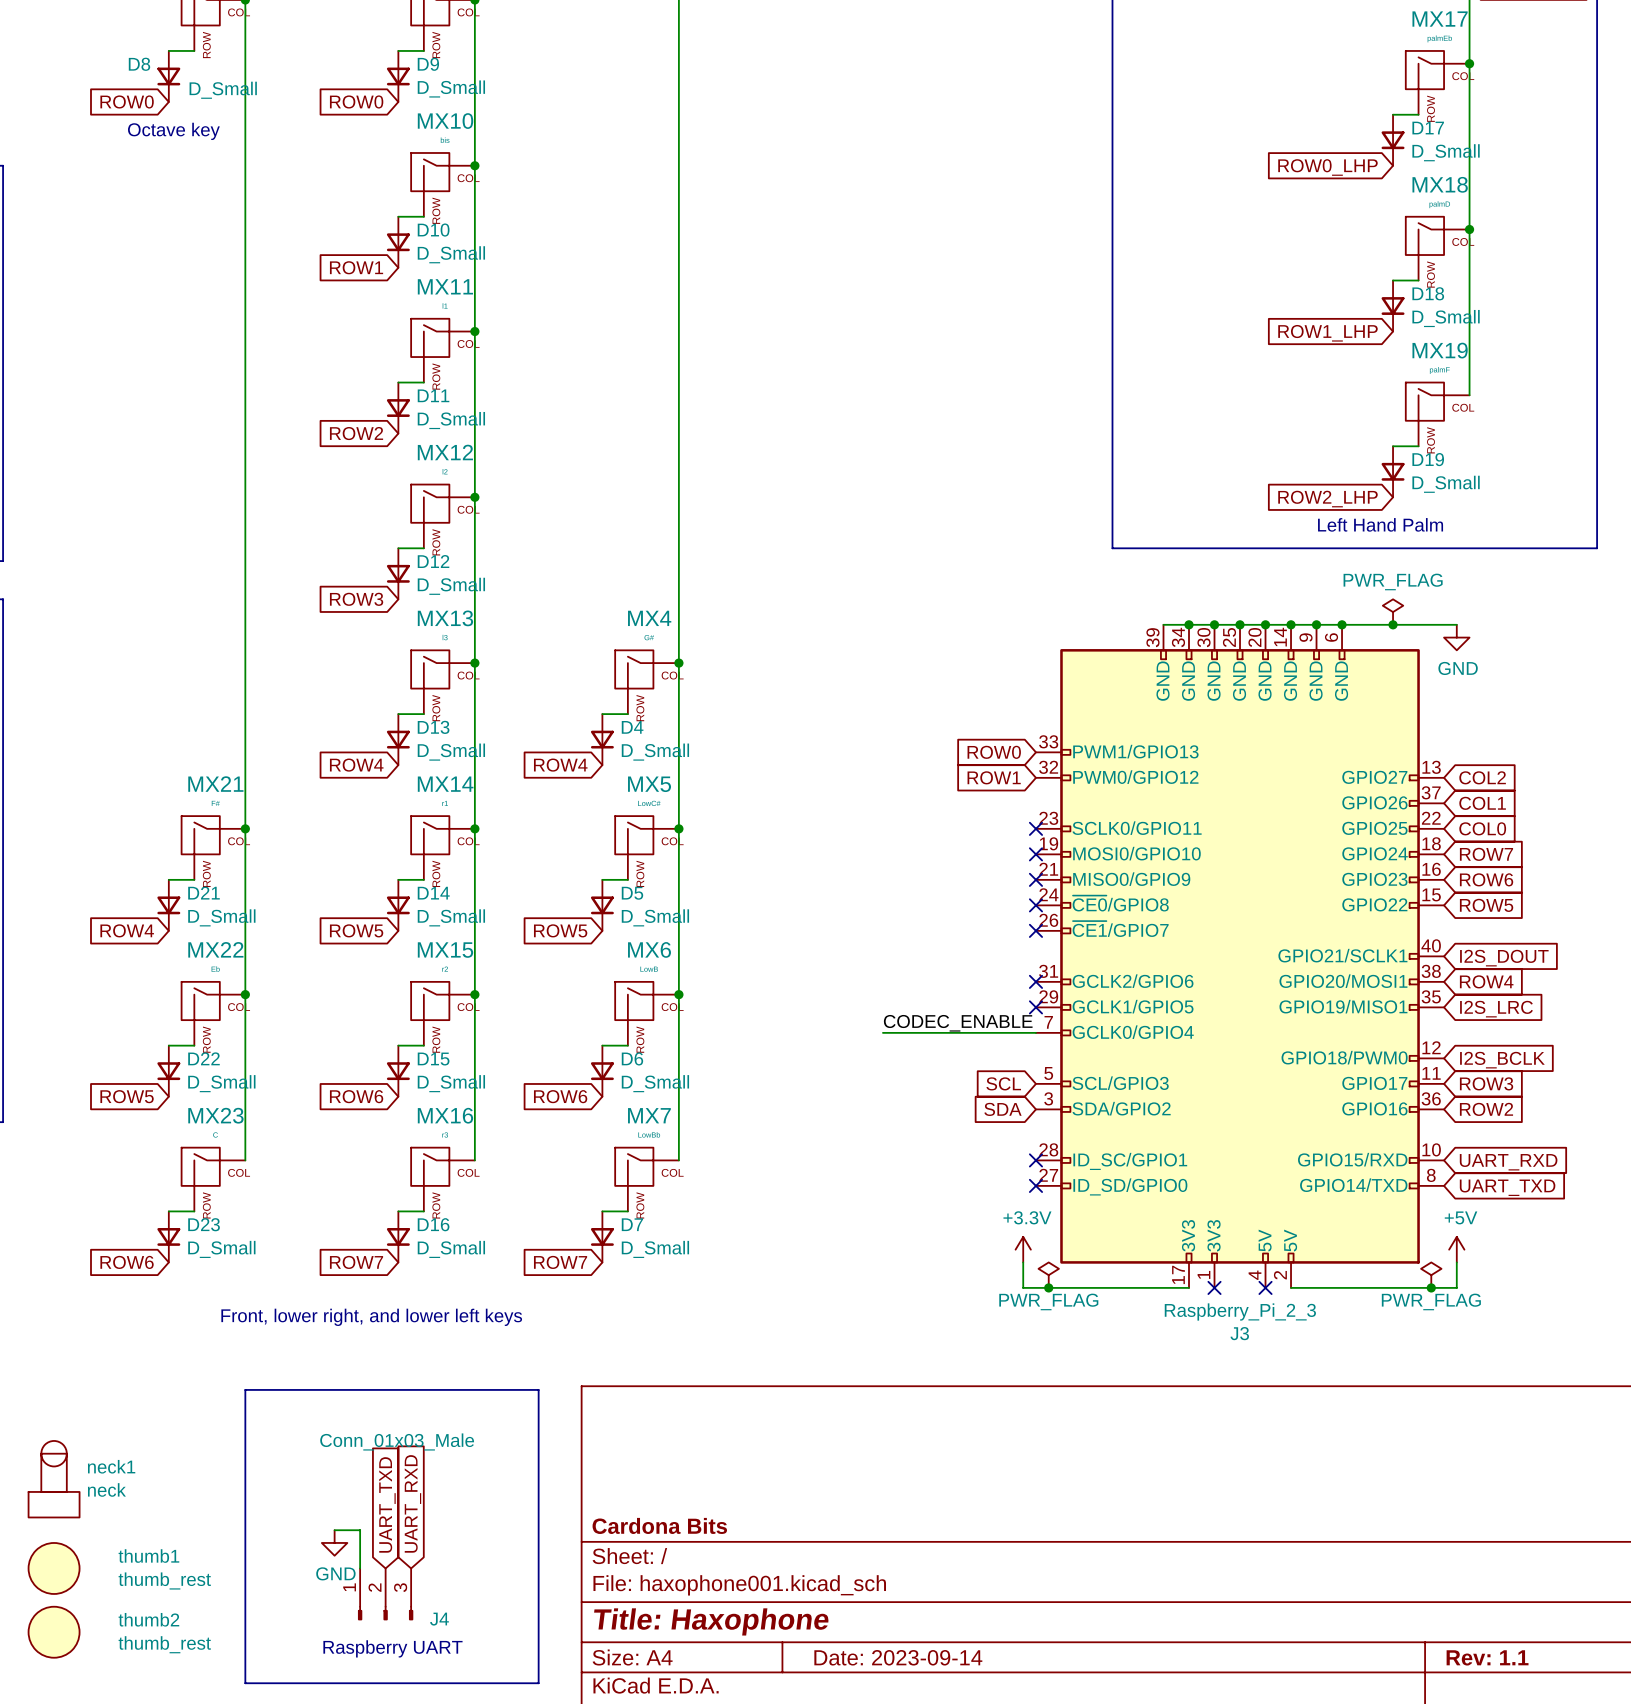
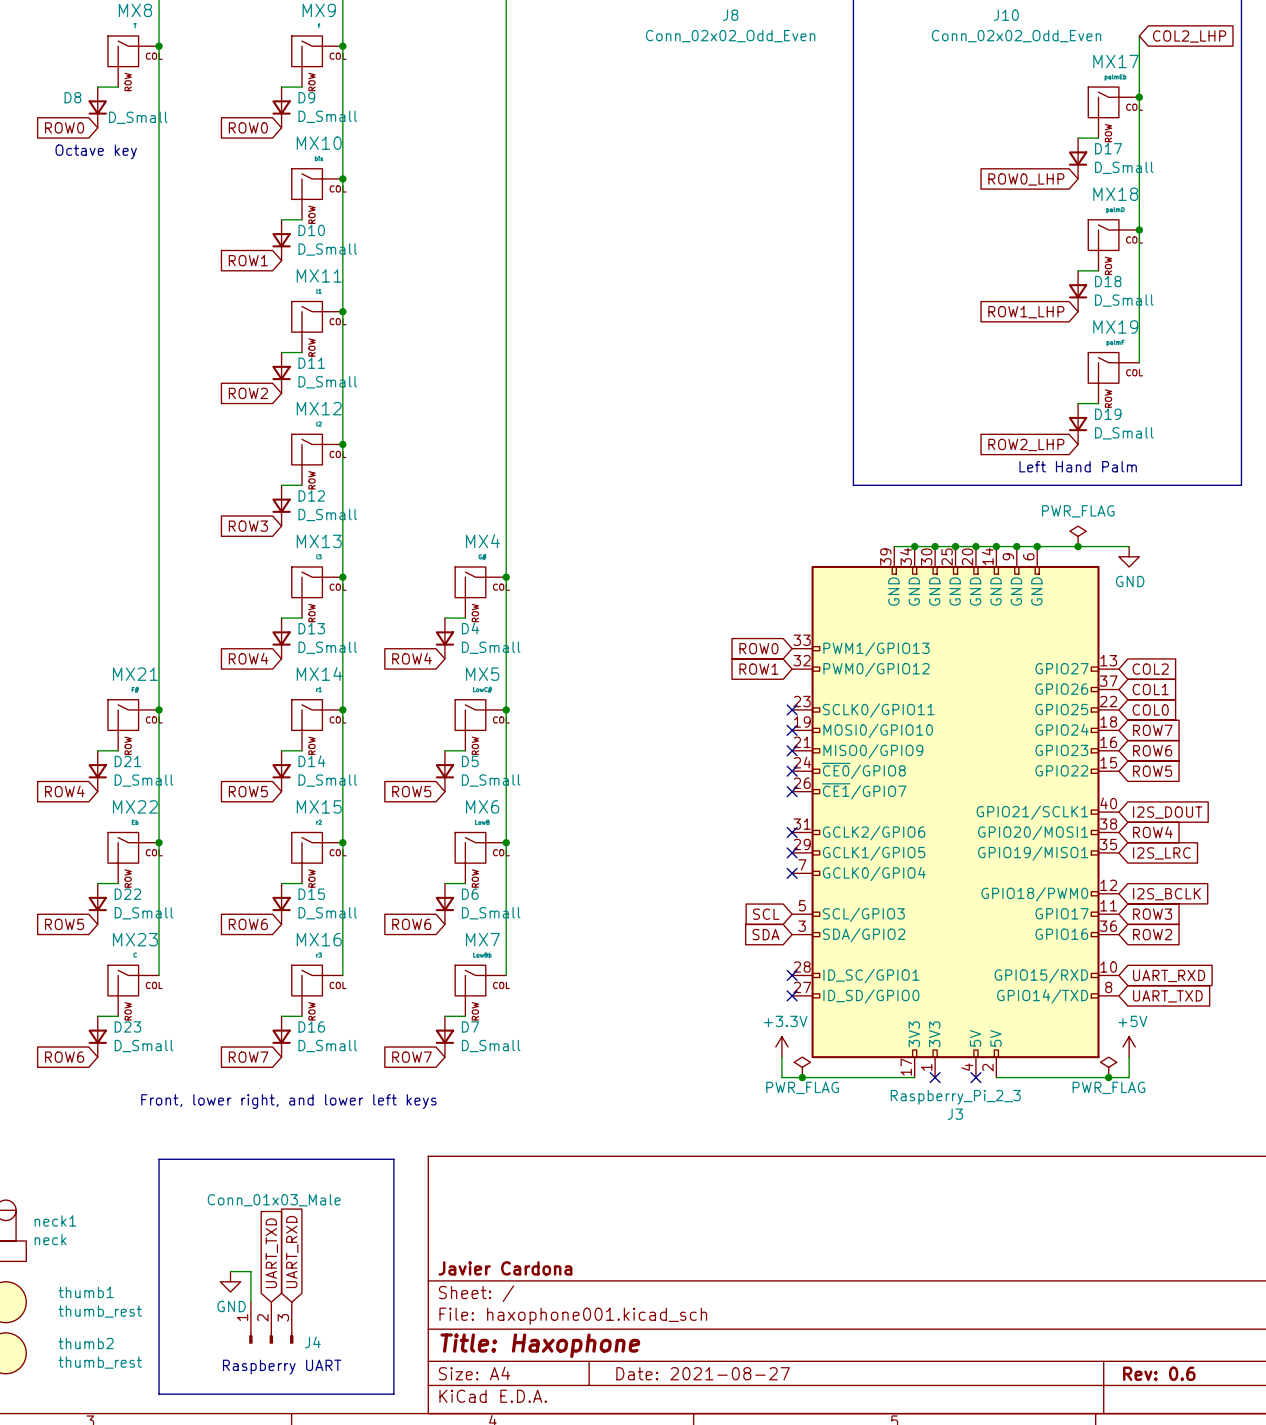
label: CODEC_ENABLE (958, 1023) -> none
wire: (882, 1032) (1035, 1032) -> none
no-connect mark: none -> (792, 873)
title block: Cardona Bits (659, 1525) -> Javier Cardona (505, 1268)
title block: Date: 2023-09-14 (898, 1657) -> Date: 2021-08-27 (703, 1373)
title block: Rev: 1.1 (1487, 1657) -> Rev: 0.6 (1159, 1373)

